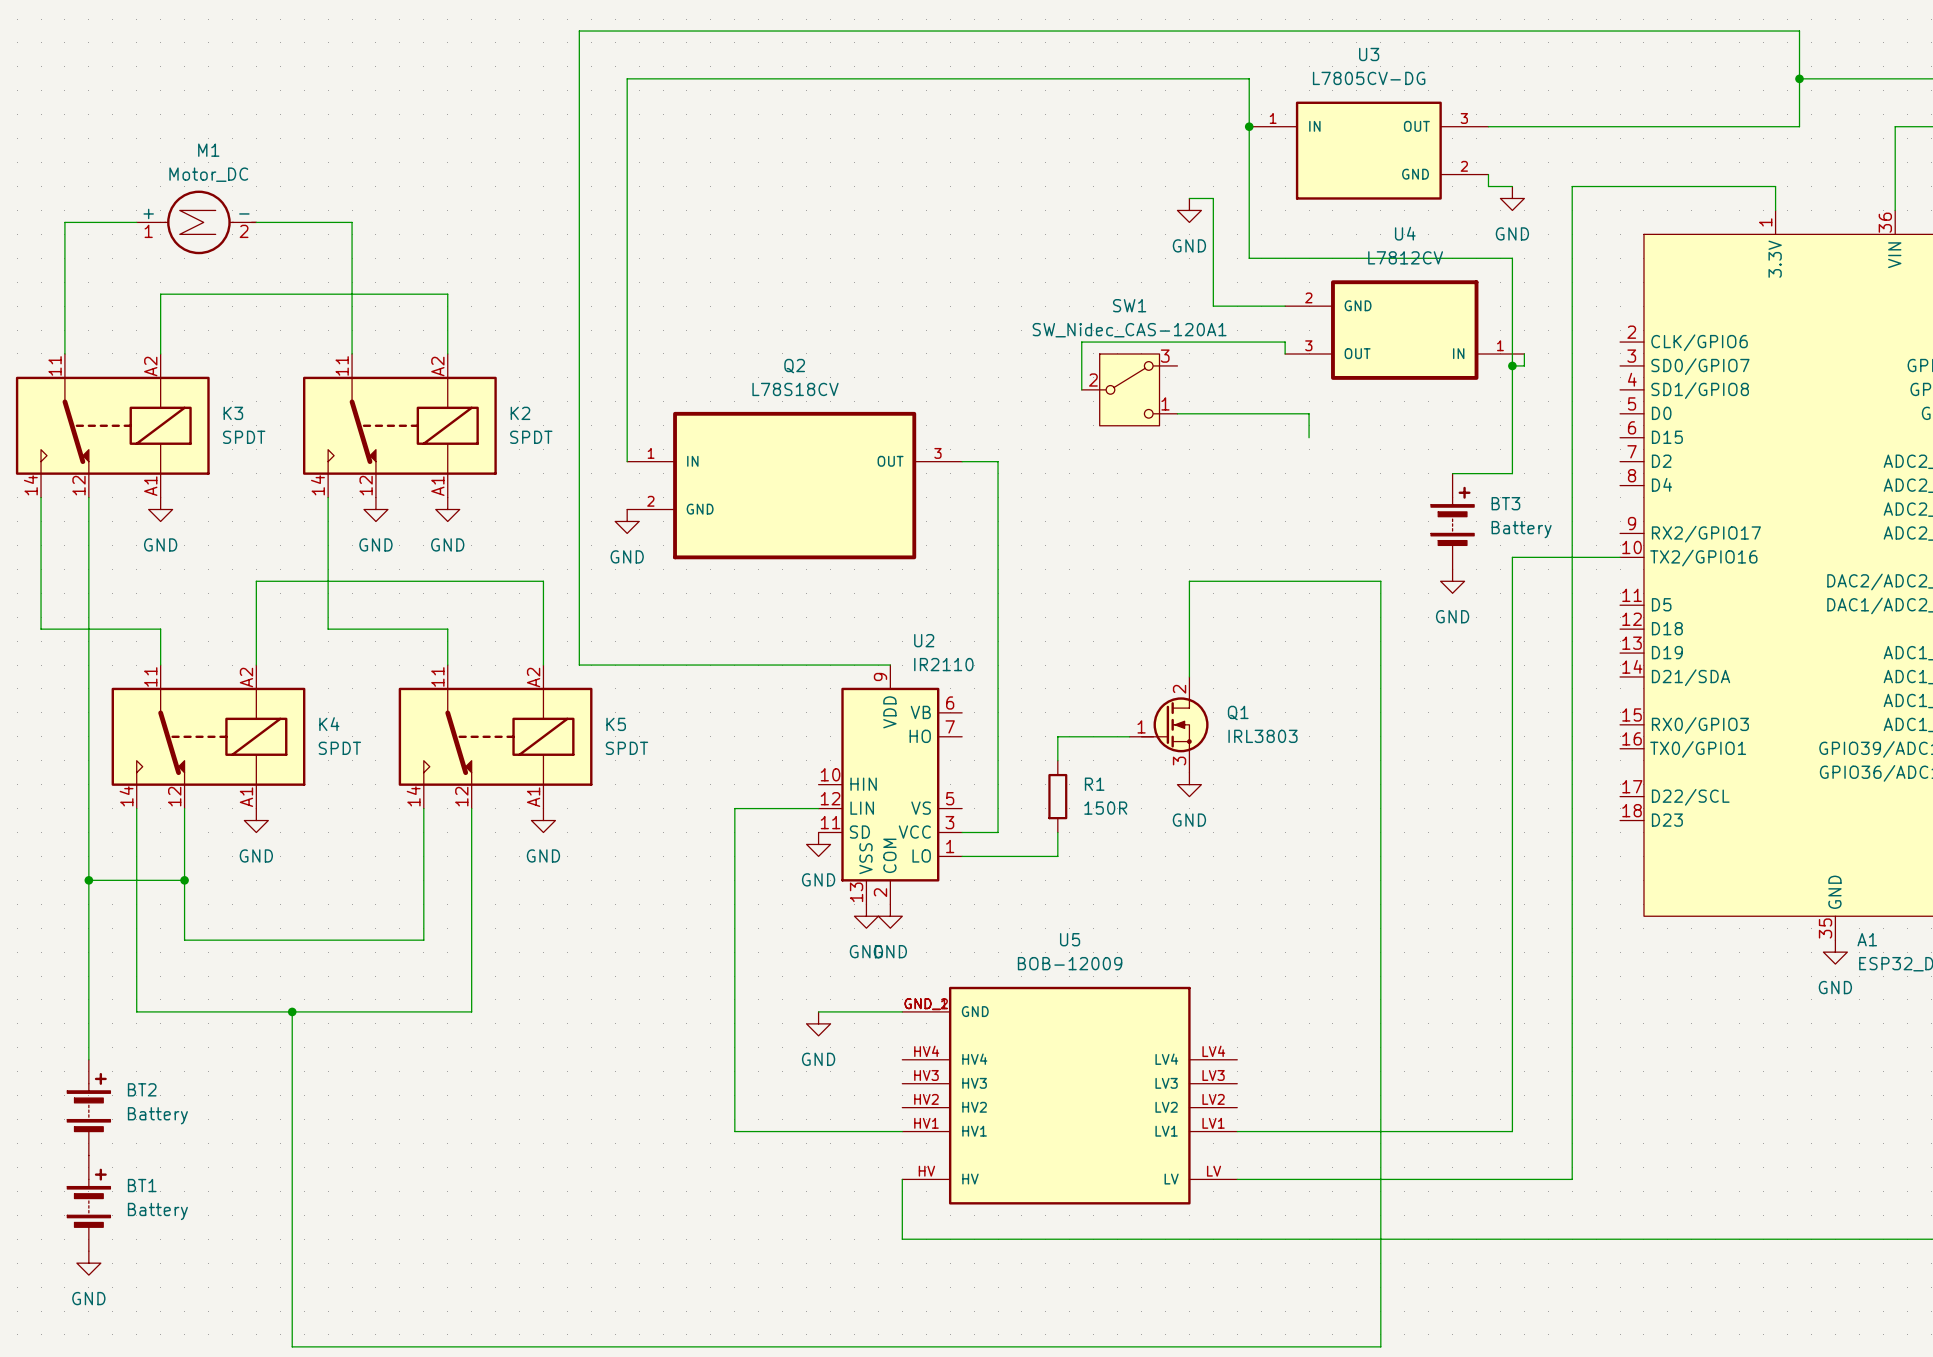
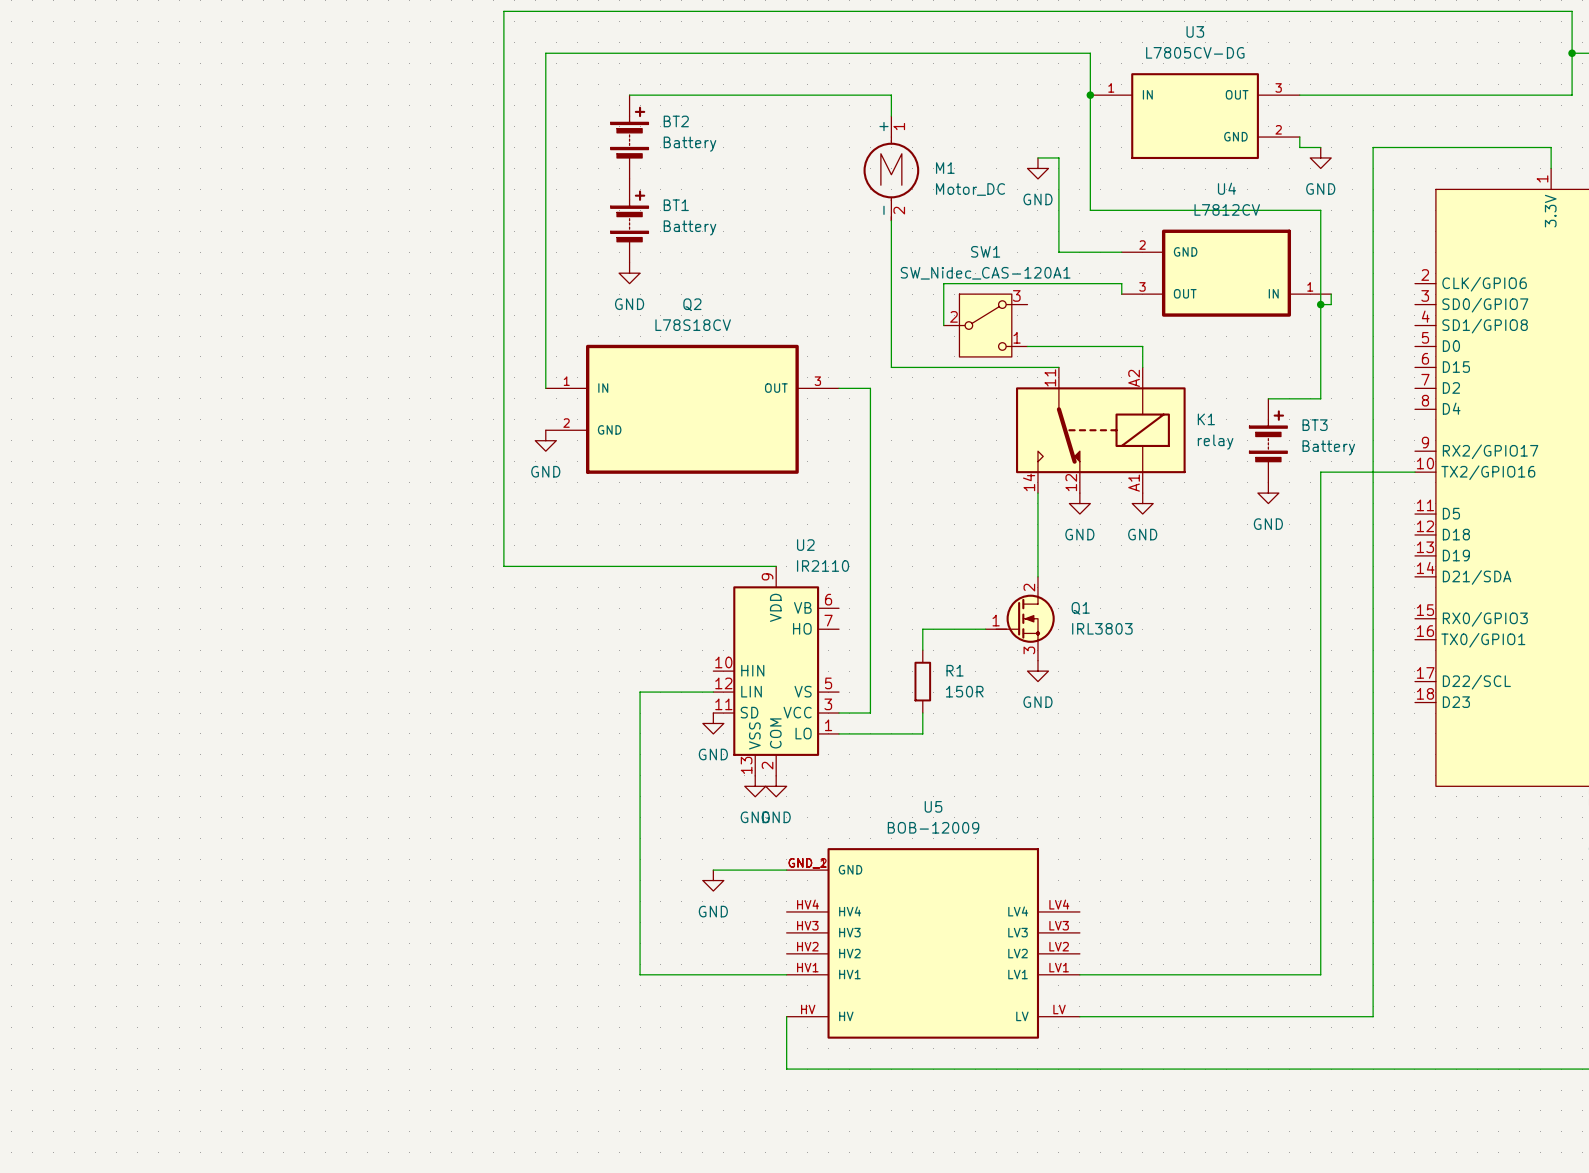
wire: none -> (629, 95) (891, 95) (891, 116)
M1 value position: Motor_DC (208, 174) -> Motor_DC (970, 189)
wire: (136, 222) (64, 222) (64, 353) -> none
M1 position: (196, 222) -> (891, 168)
M1 rotation: 0° (208, 222) -> 90° clockwise (891, 178)
wire: (256, 222) (352, 222) (352, 353) -> none
wire: none -> (891, 220) (891, 367) (1058, 367)
power symbol: none -> GND (629, 273)
wire: (160, 353) (160, 294) (447, 294) (447, 353) -> none
K3: SPDT (112, 425) -> none
K2: SPDT (399, 425) -> none
wire: (41, 497) (41, 629) (160, 629) (160, 665) -> none
wire: (88, 497) (88, 1059) -> none
wire: (328, 497) (328, 629) (447, 629) (447, 665) -> none
power symbol: GND (160, 509) -> none
power symbol: GND (375, 509) -> none
power symbol: GND (447, 509) -> none
K1: none -> relay (1100, 430)
wire: (1189, 581) (1380, 581) (1380, 1346) (292, 1346) (292, 1011) -> none
power symbol: none -> GND (1079, 503)
power symbol: none -> GND (1142, 503)
wire: (256, 665) (256, 581) (543, 581) (543, 665) -> none
K4: SPDT (208, 736) -> none
K5: SPDT (495, 736) -> none
wire: (136, 808) (136, 1011) (471, 1011) (471, 808) -> none
wire: (184, 808) (184, 940) (423, 940) (423, 808) -> none
power symbol: GND (256, 820) -> none
power symbol: GND (543, 820) -> none
wire: (88, 880) (184, 880) -> none
junction: (88, 880) -> none
junction: (184, 880) -> none
junction: (292, 1011) -> none
BT2 position: (88, 1107) -> (629, 137)
BT1 position: (88, 1203) -> (629, 220)
power symbol: GND (88, 1263) -> none

